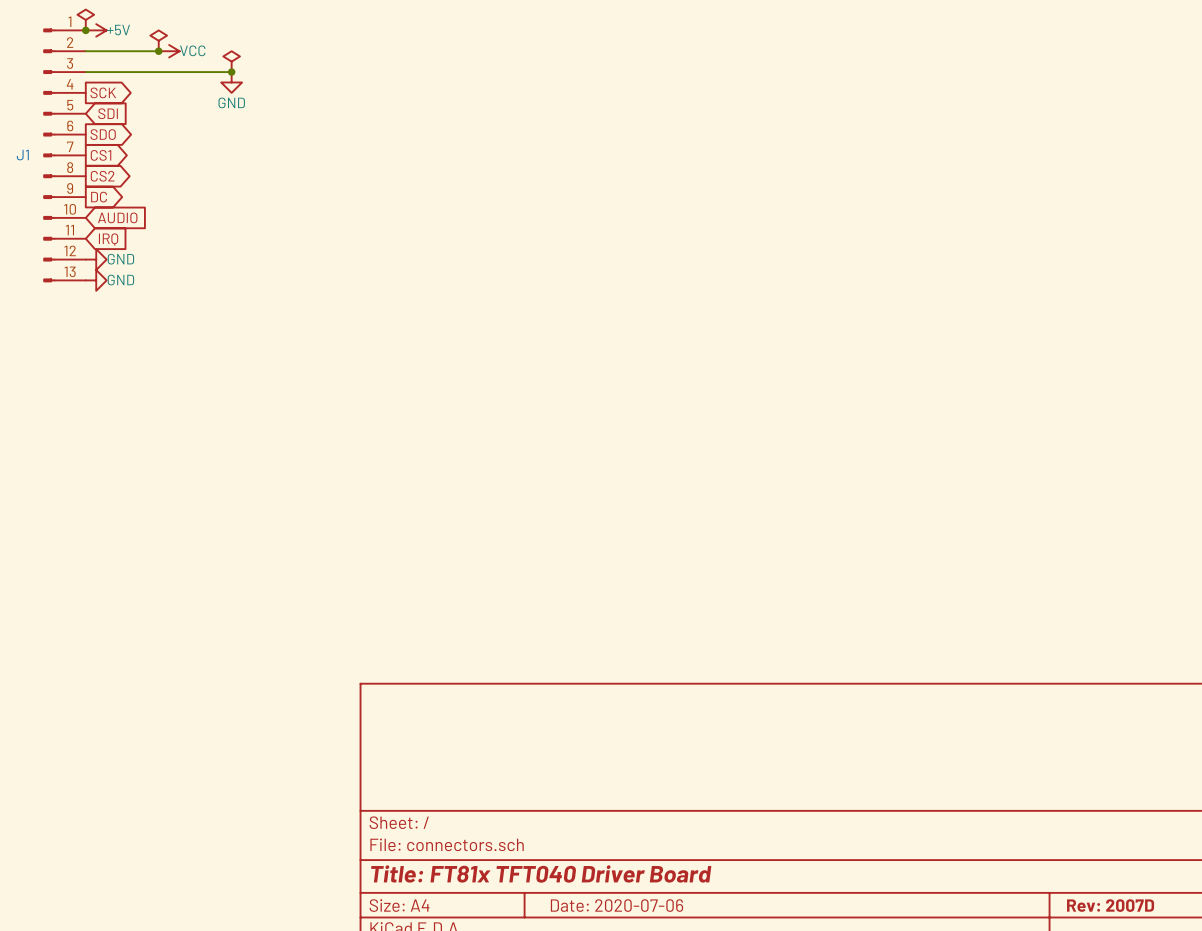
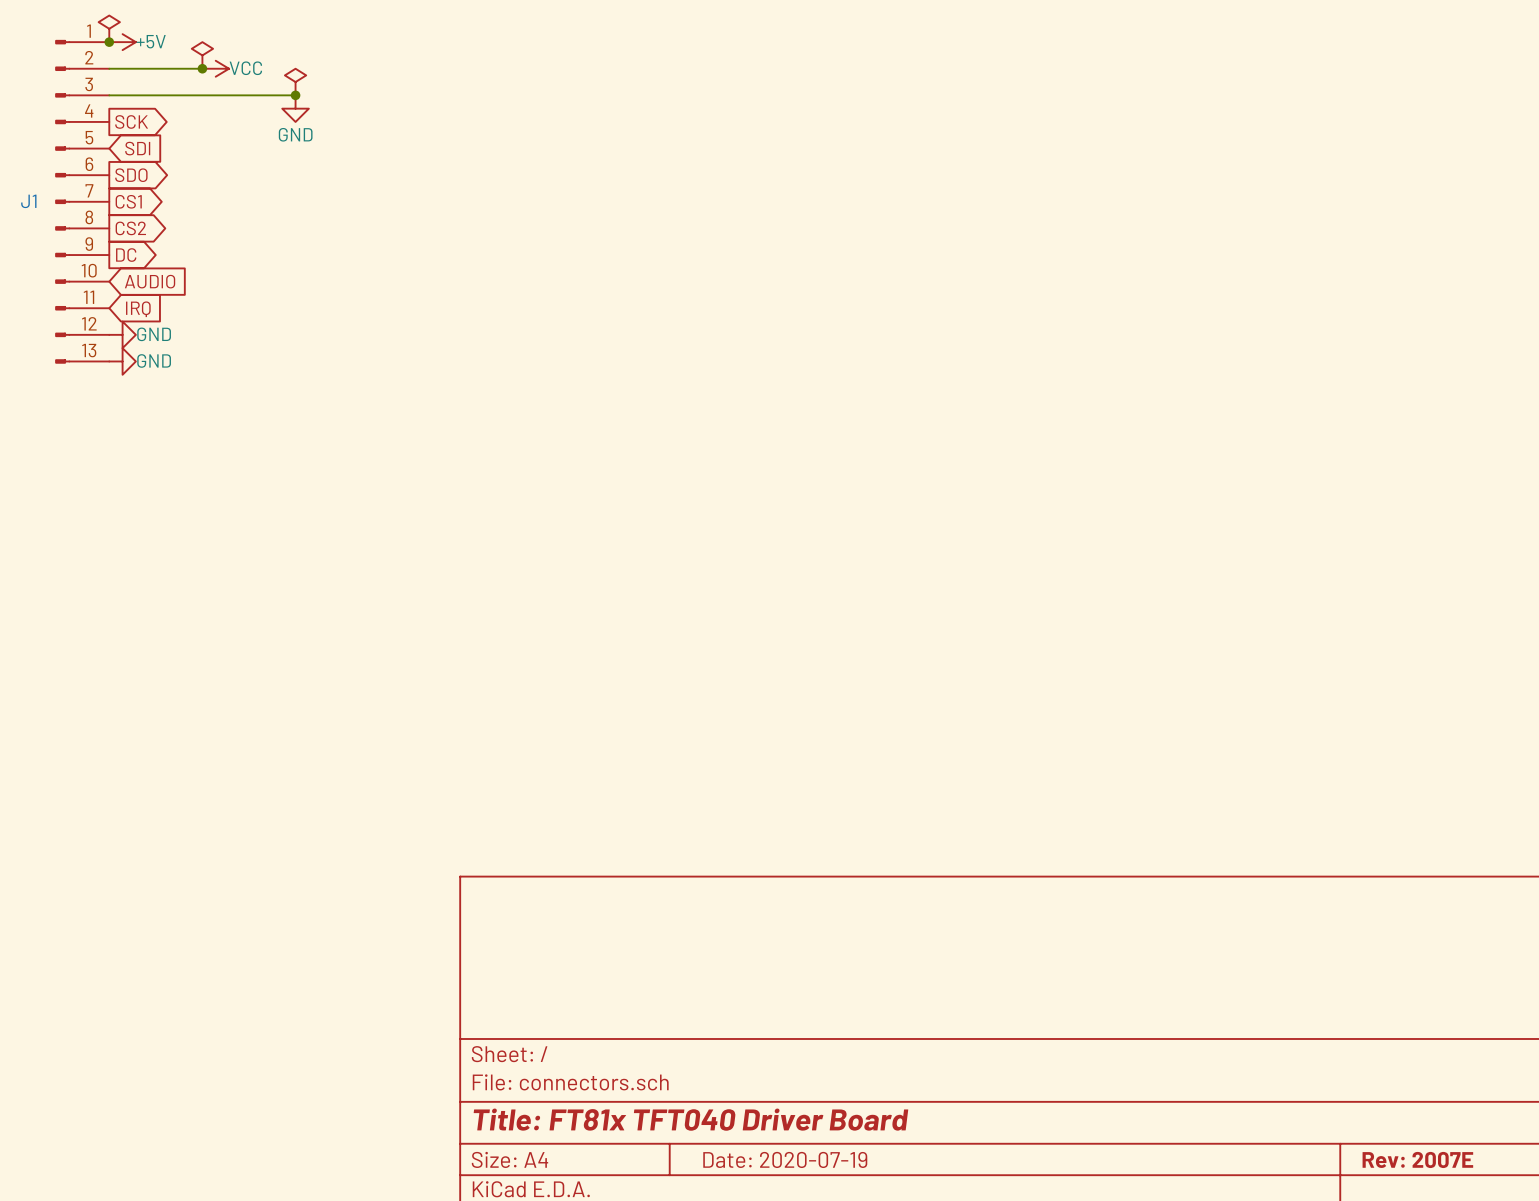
title block: Date: 2020-07-06 (617, 905) -> Date: 2020-07-19 (785, 1159)
title block: Rev: 2007D (1110, 905) -> Rev: 2007E (1417, 1159)

